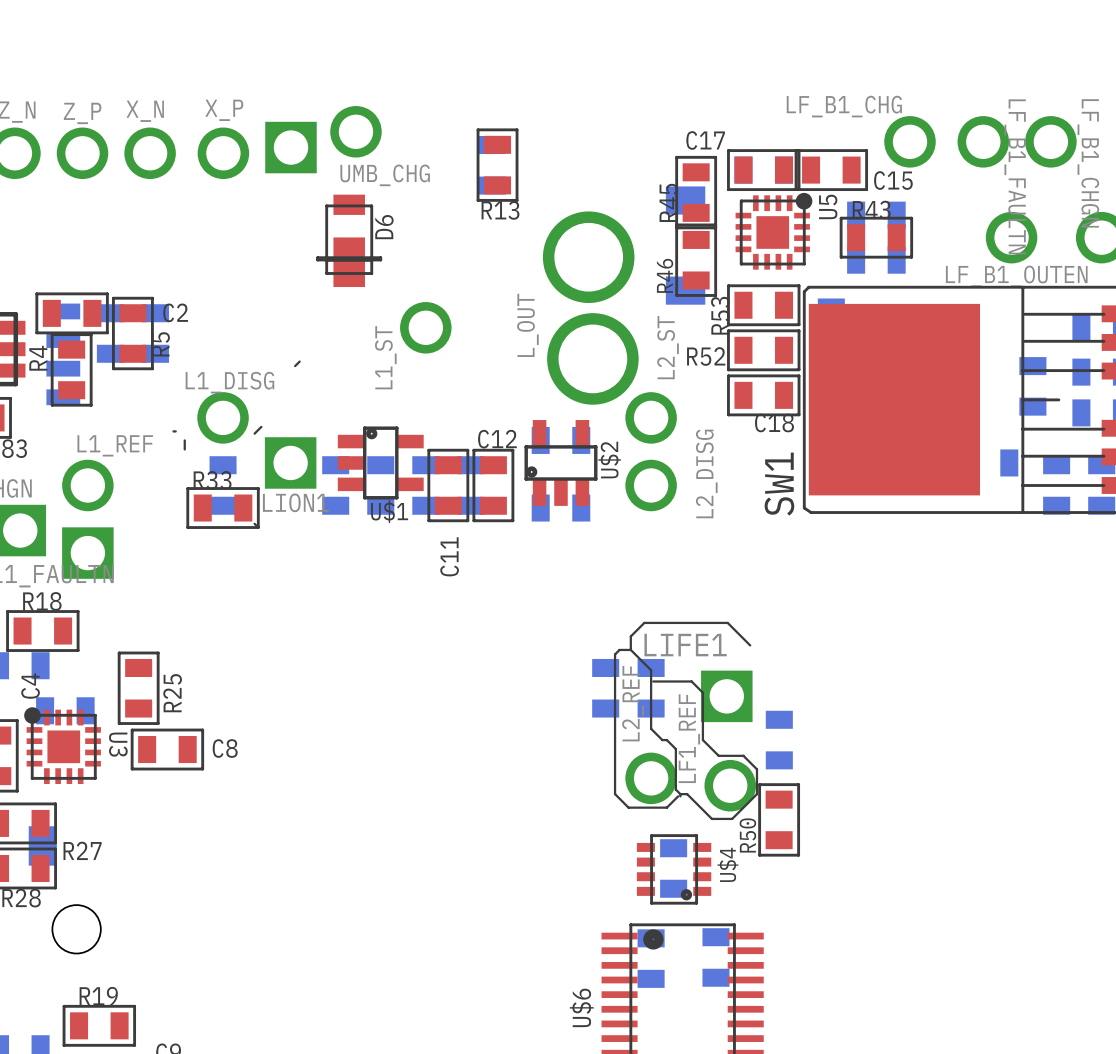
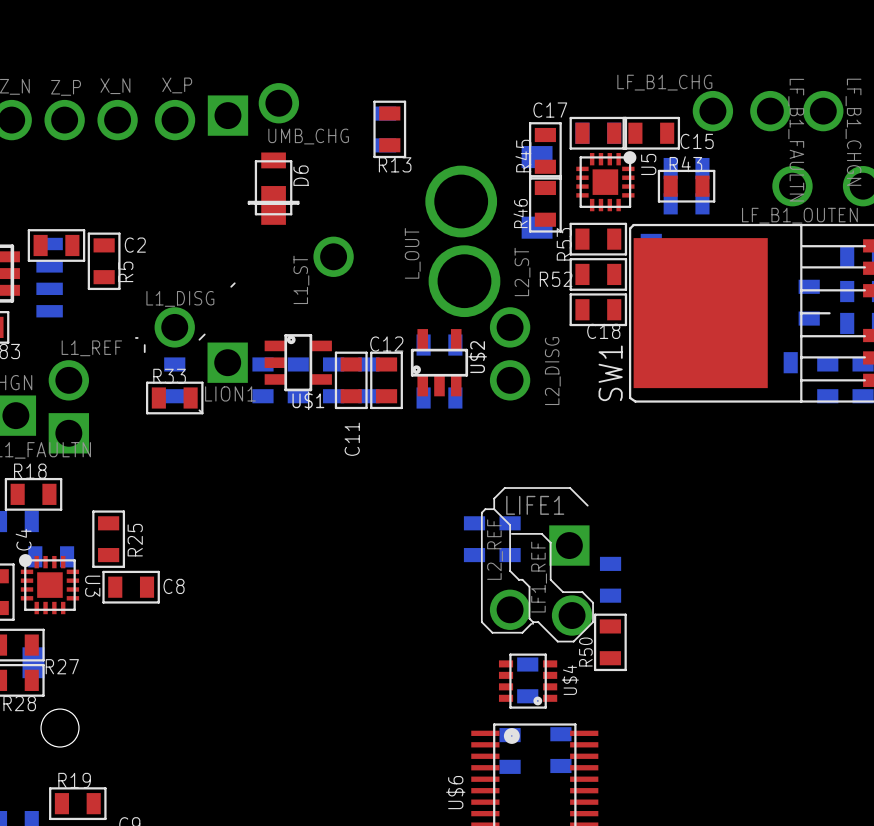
part: (110, 333) -> none
part: (155, 333) -> none
R4: (71, 369) -> none

